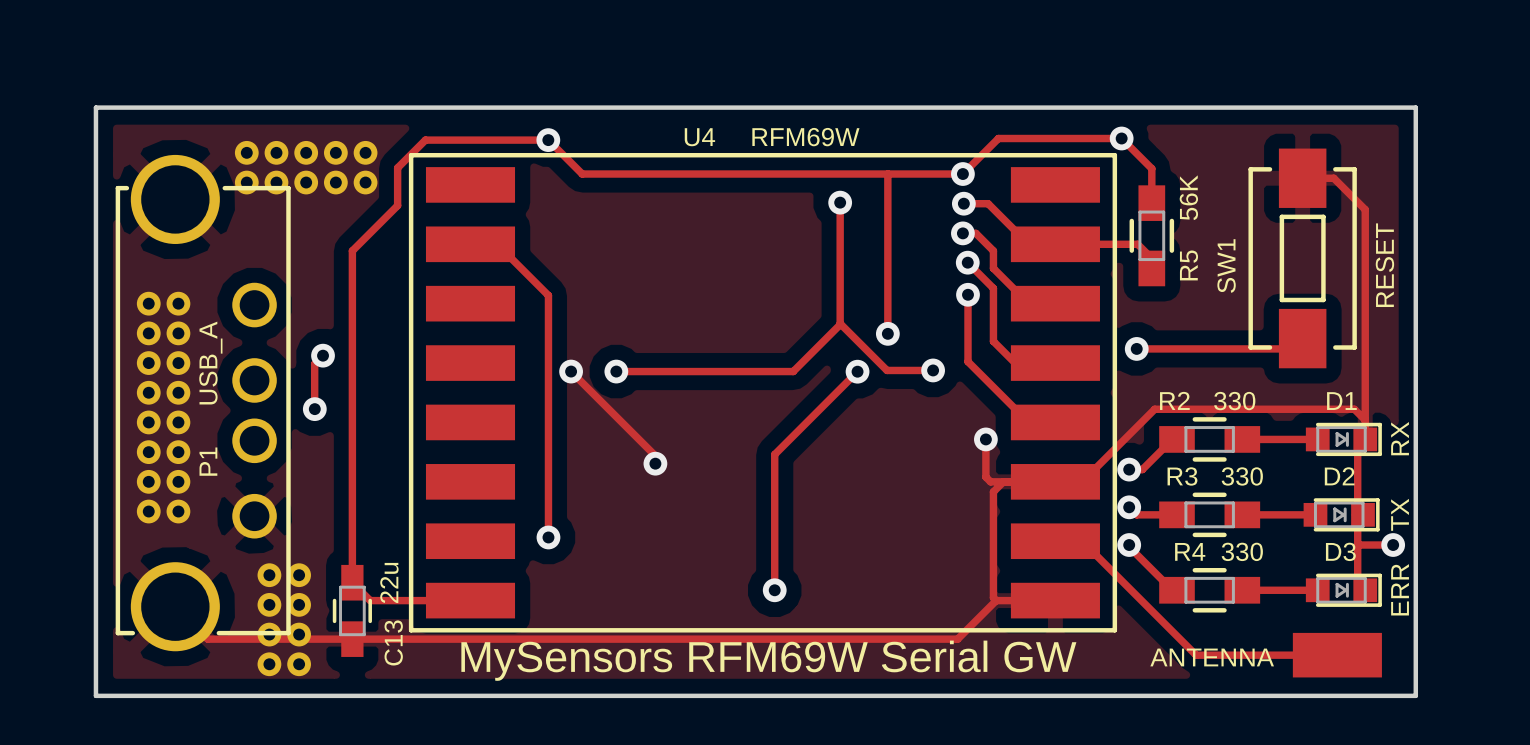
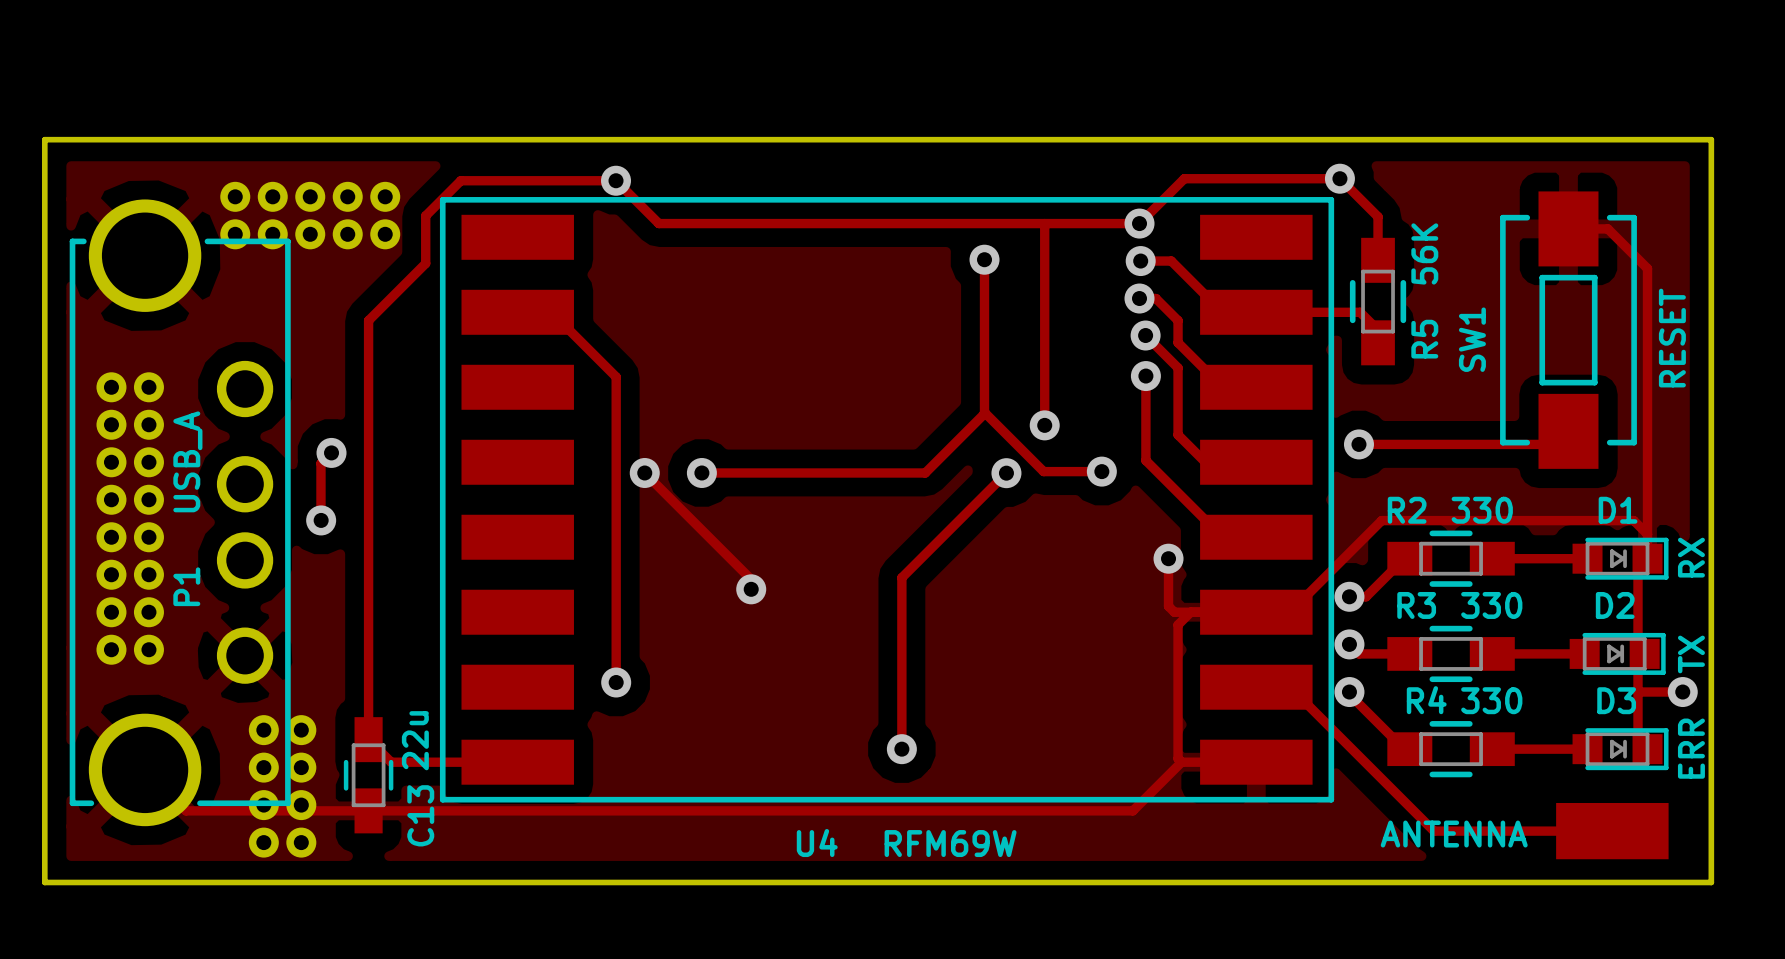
U4 name position: U4 (699, 137) -> U4 (817, 843)
U4 value position: RFM69W (805, 137) -> RFM69W (950, 843)
text: MySensors RFM69W Serial GW (768, 660) -> none

